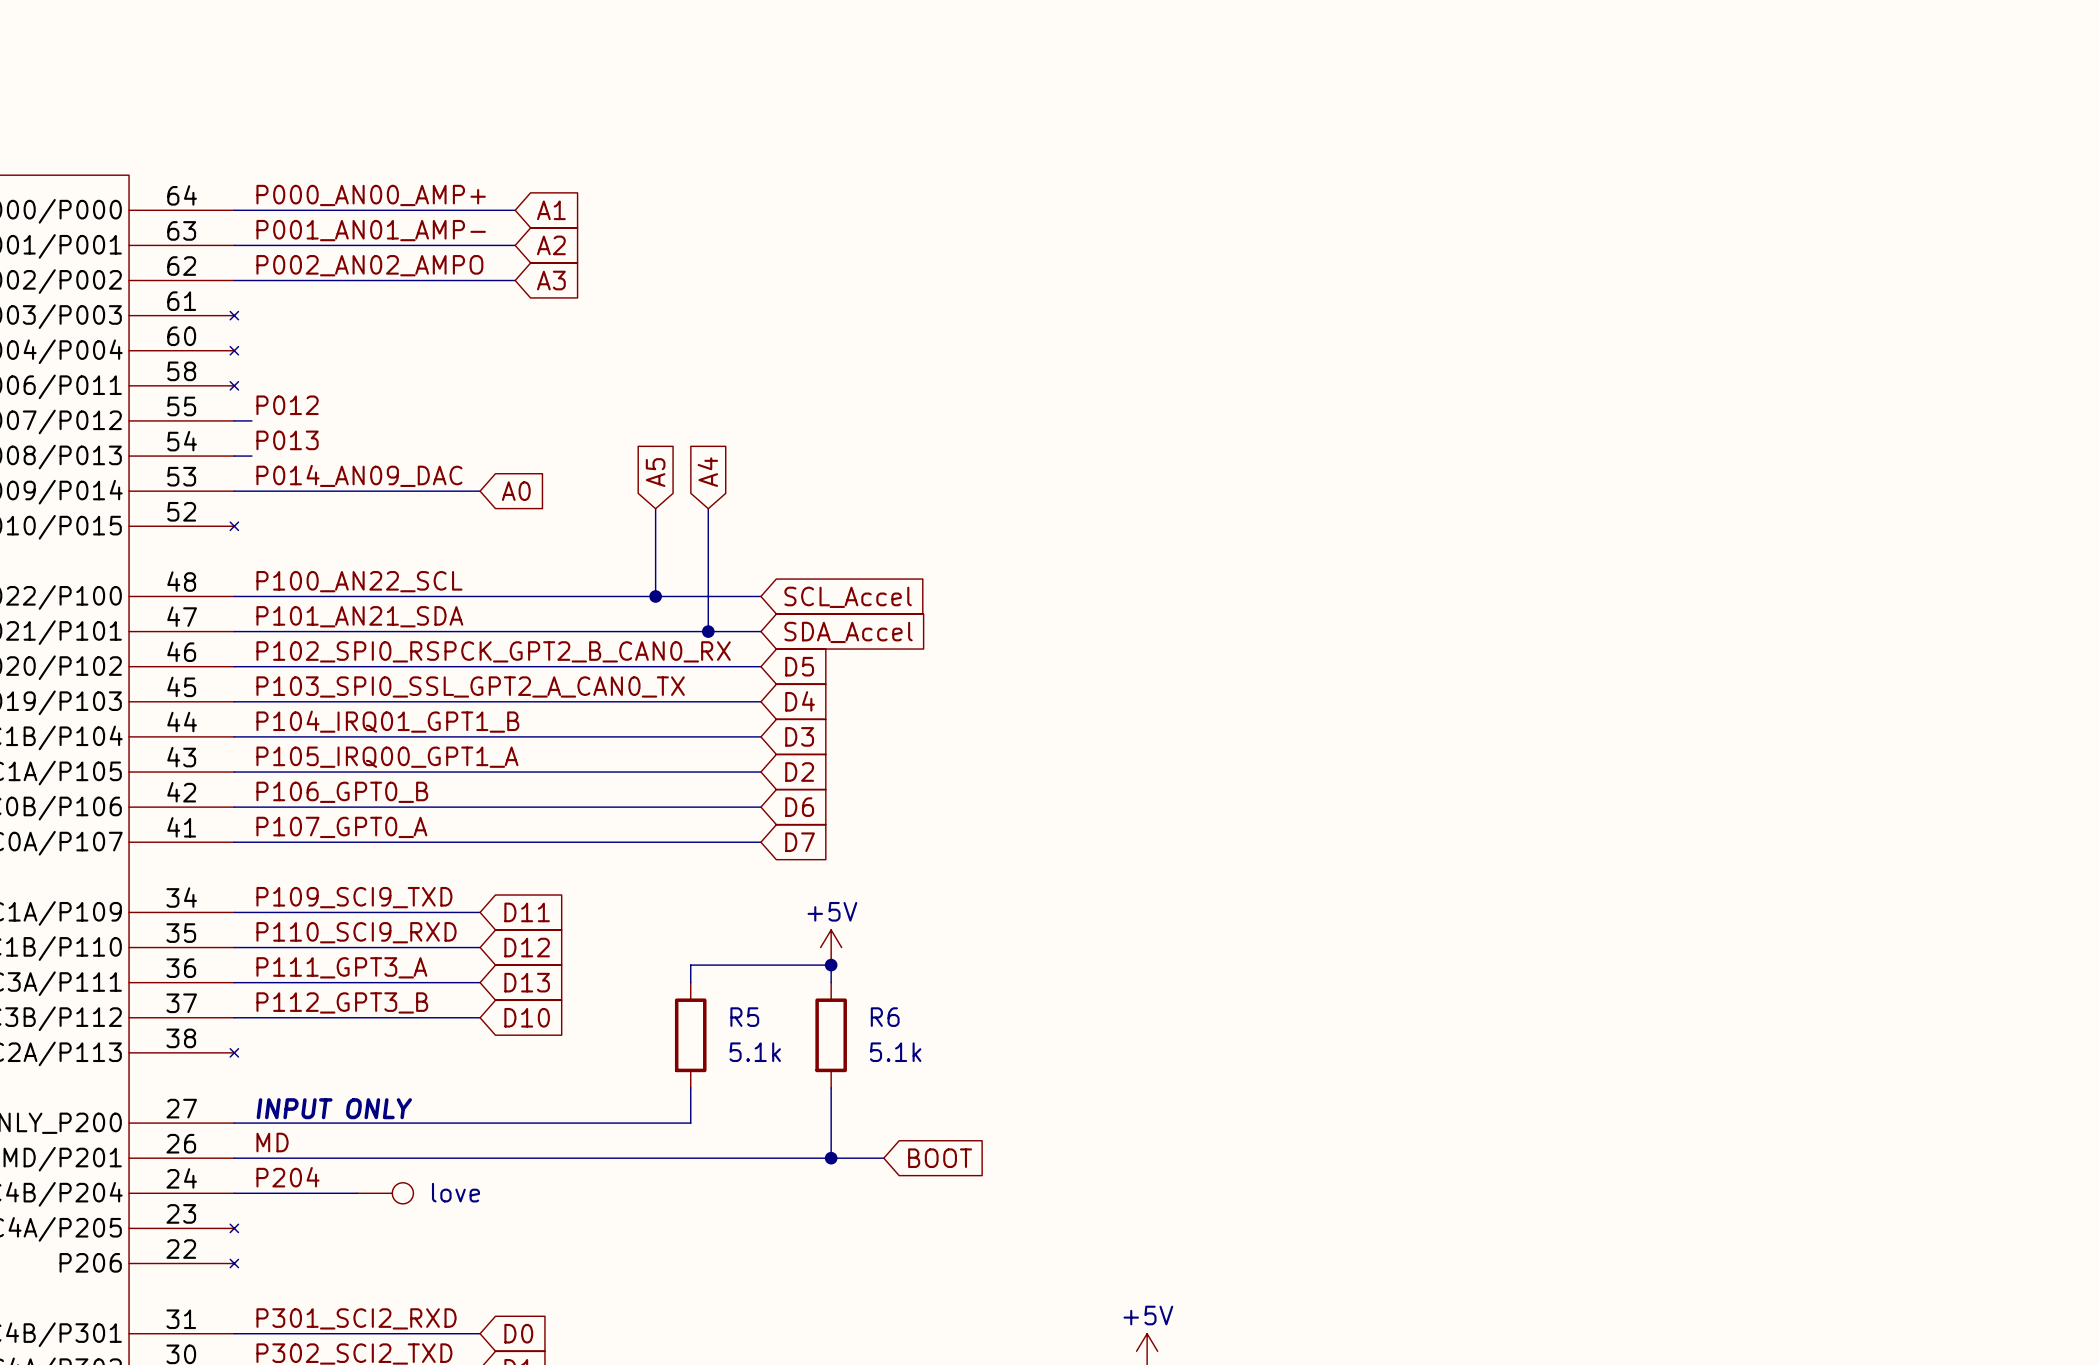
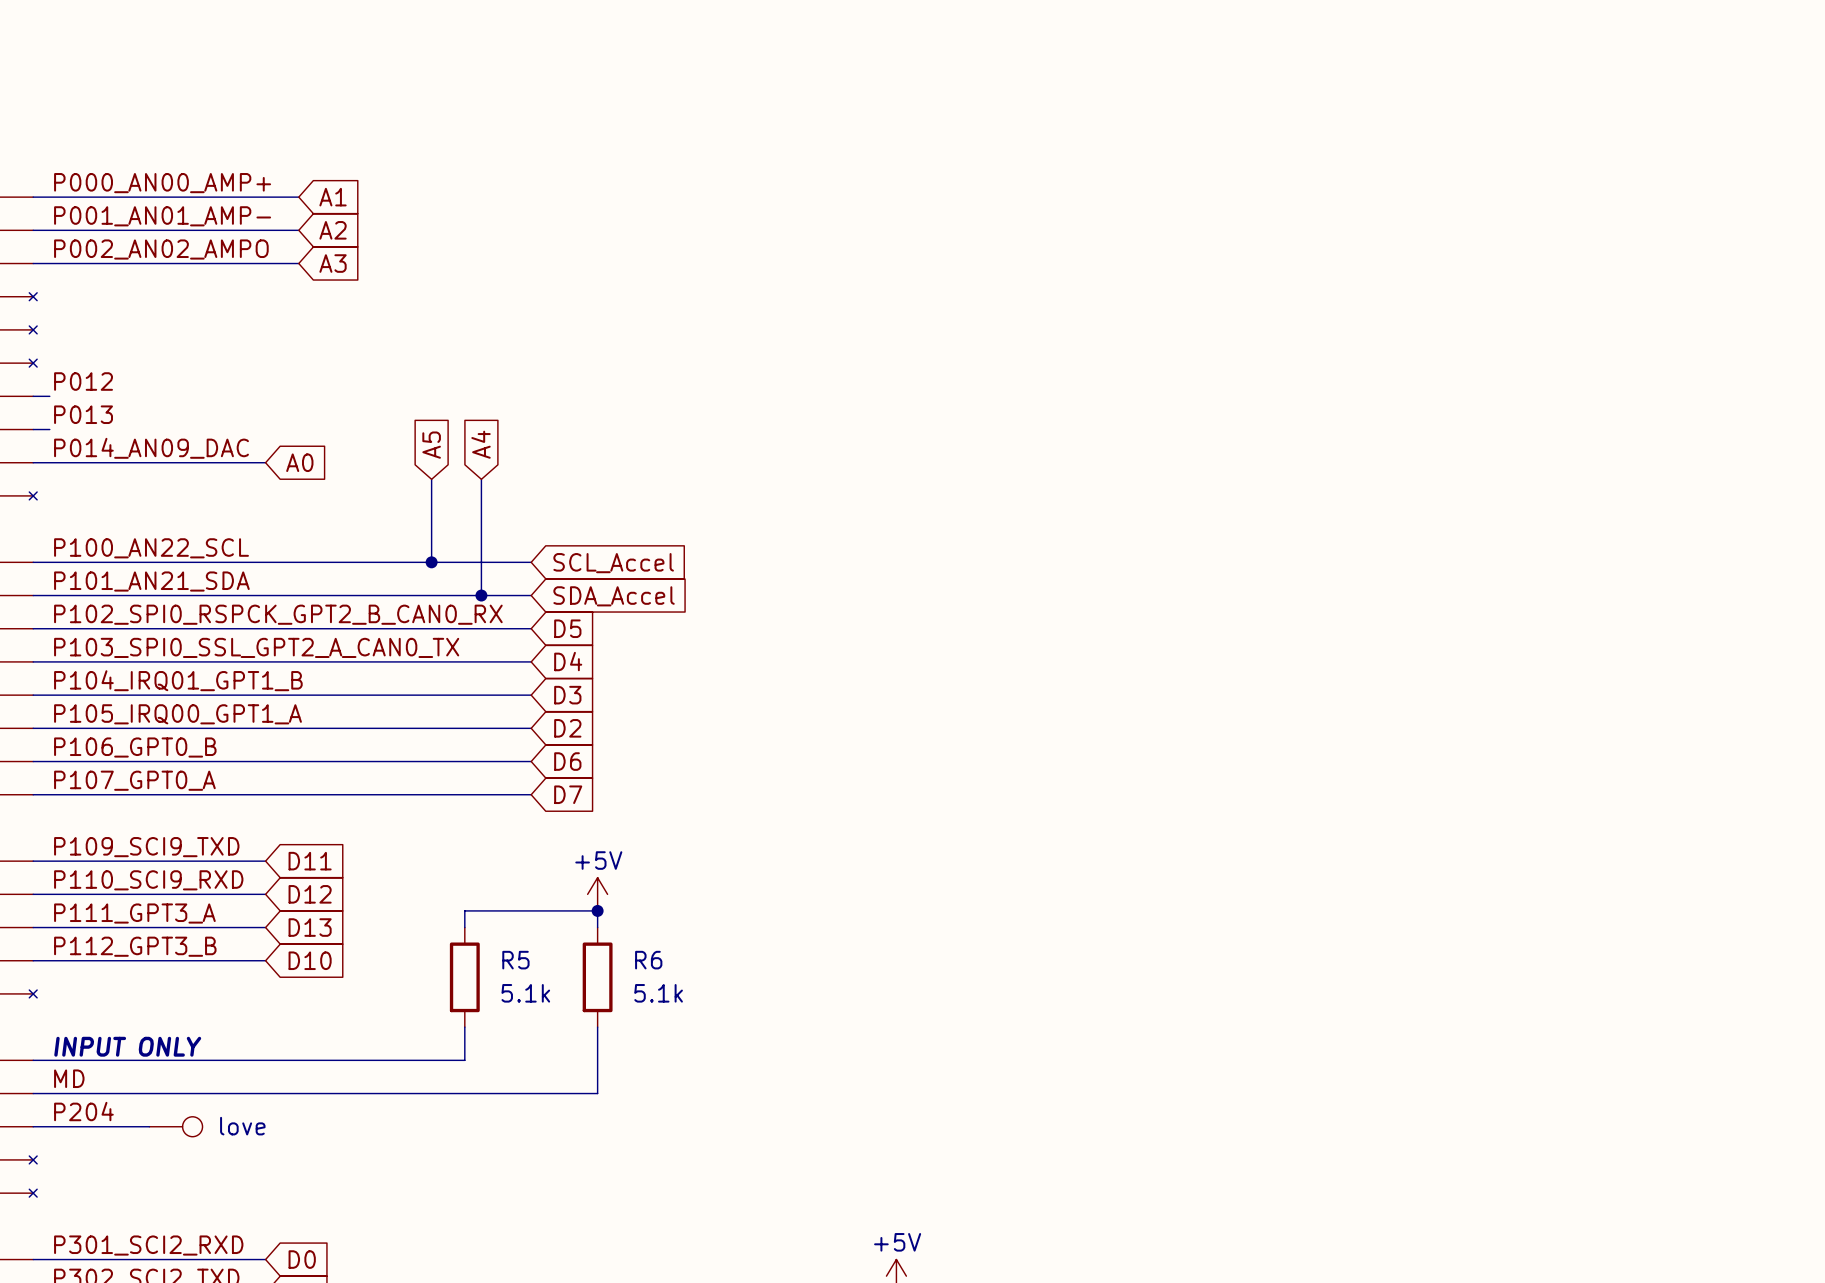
wire: (831, 1158) (883, 1158) -> none
junction: (831, 1158) -> none
global label: BOOT (940, 1158) -> none

